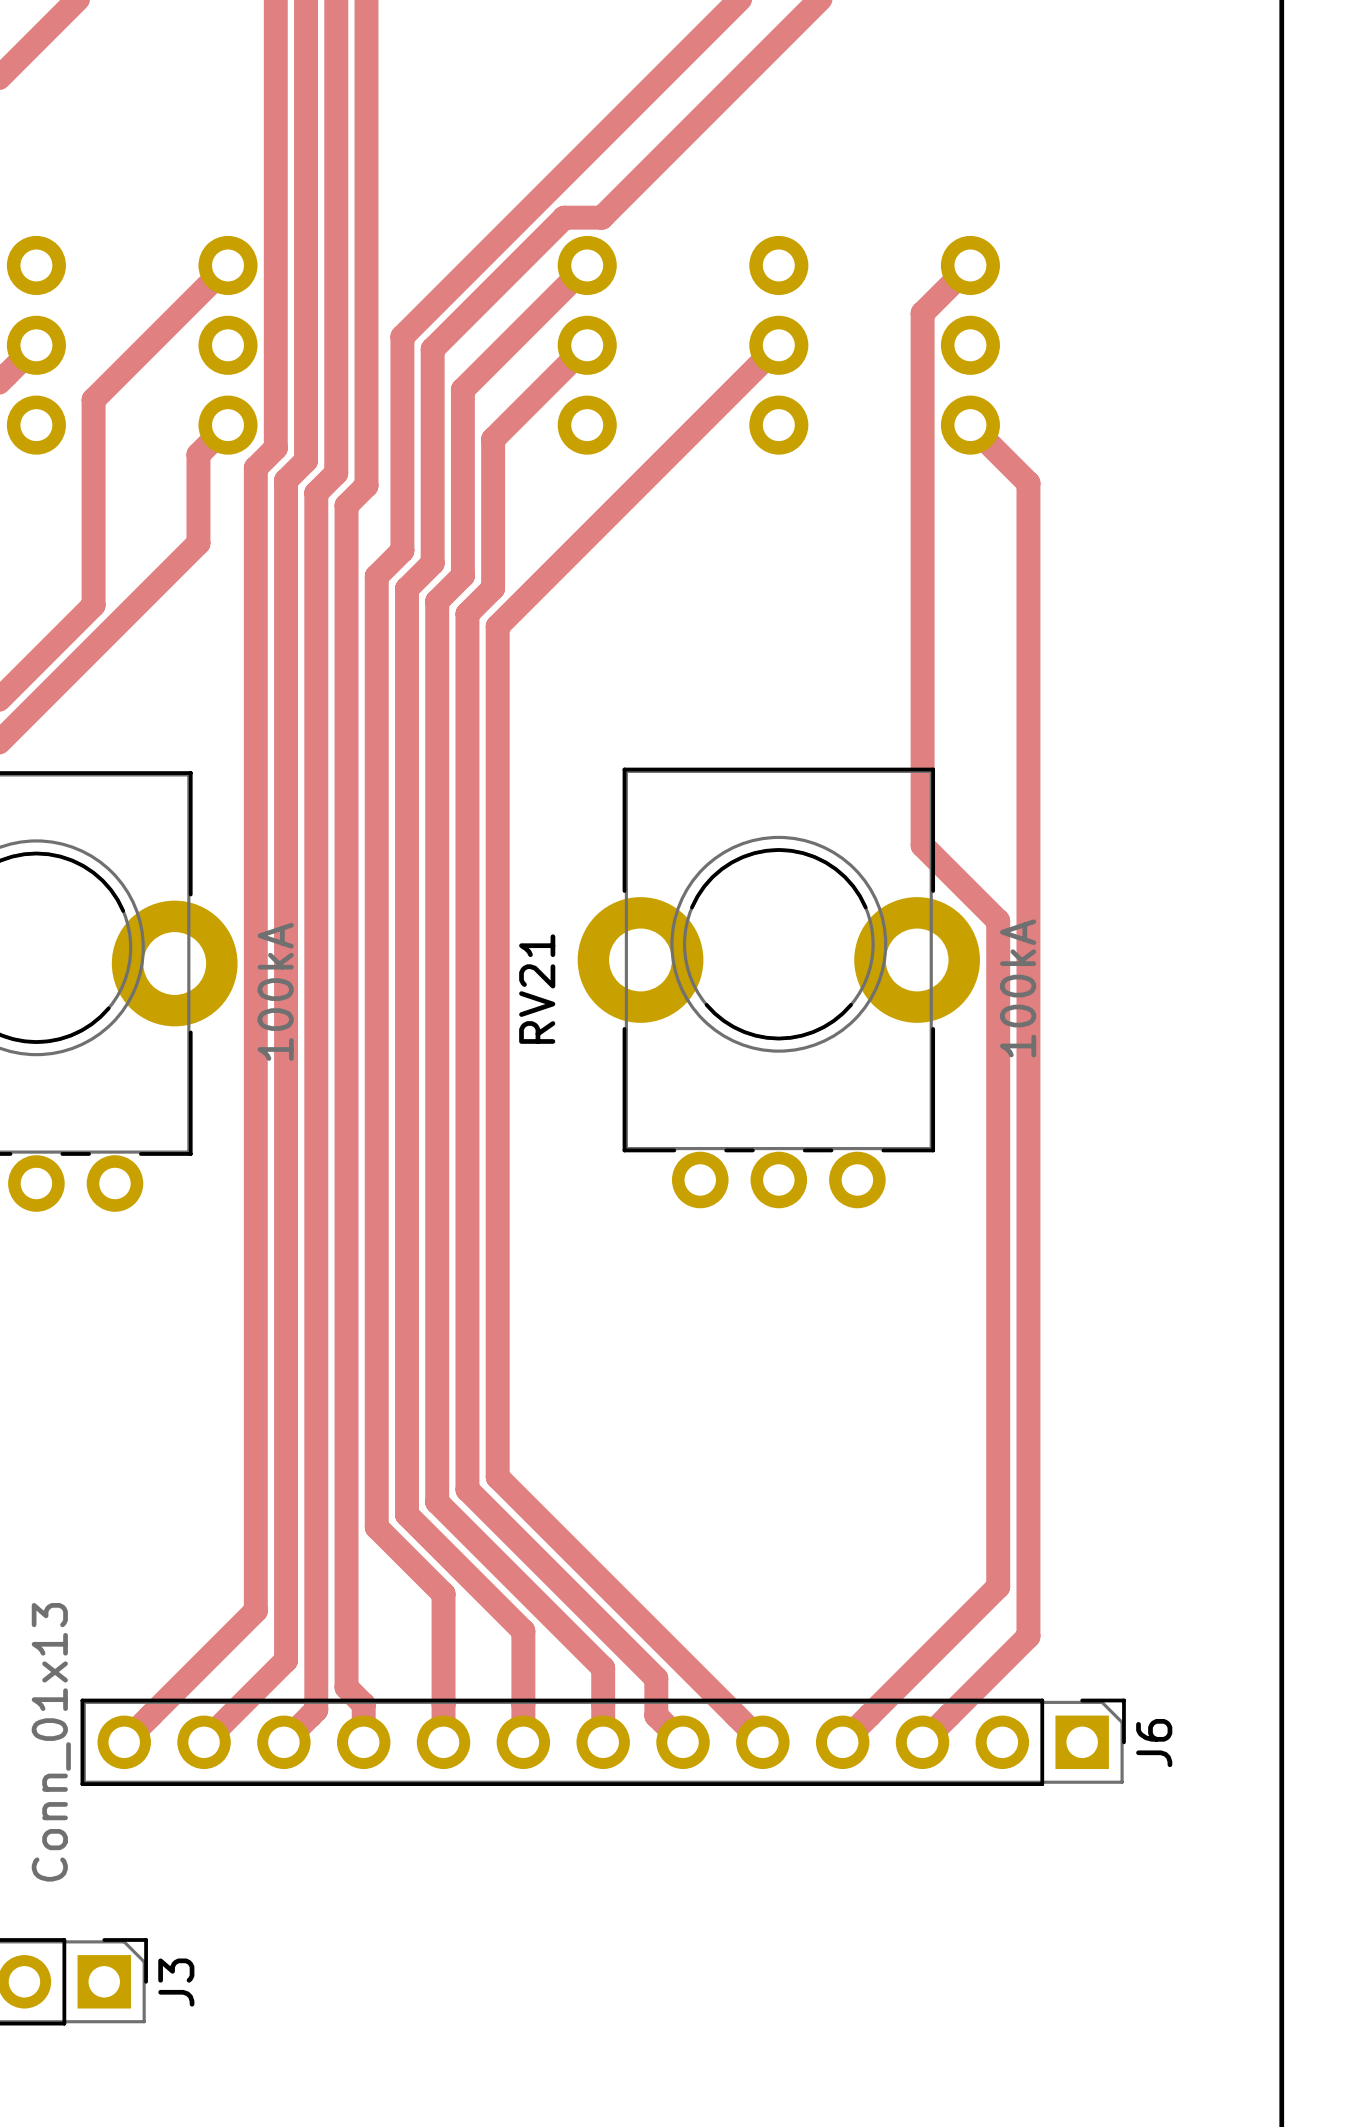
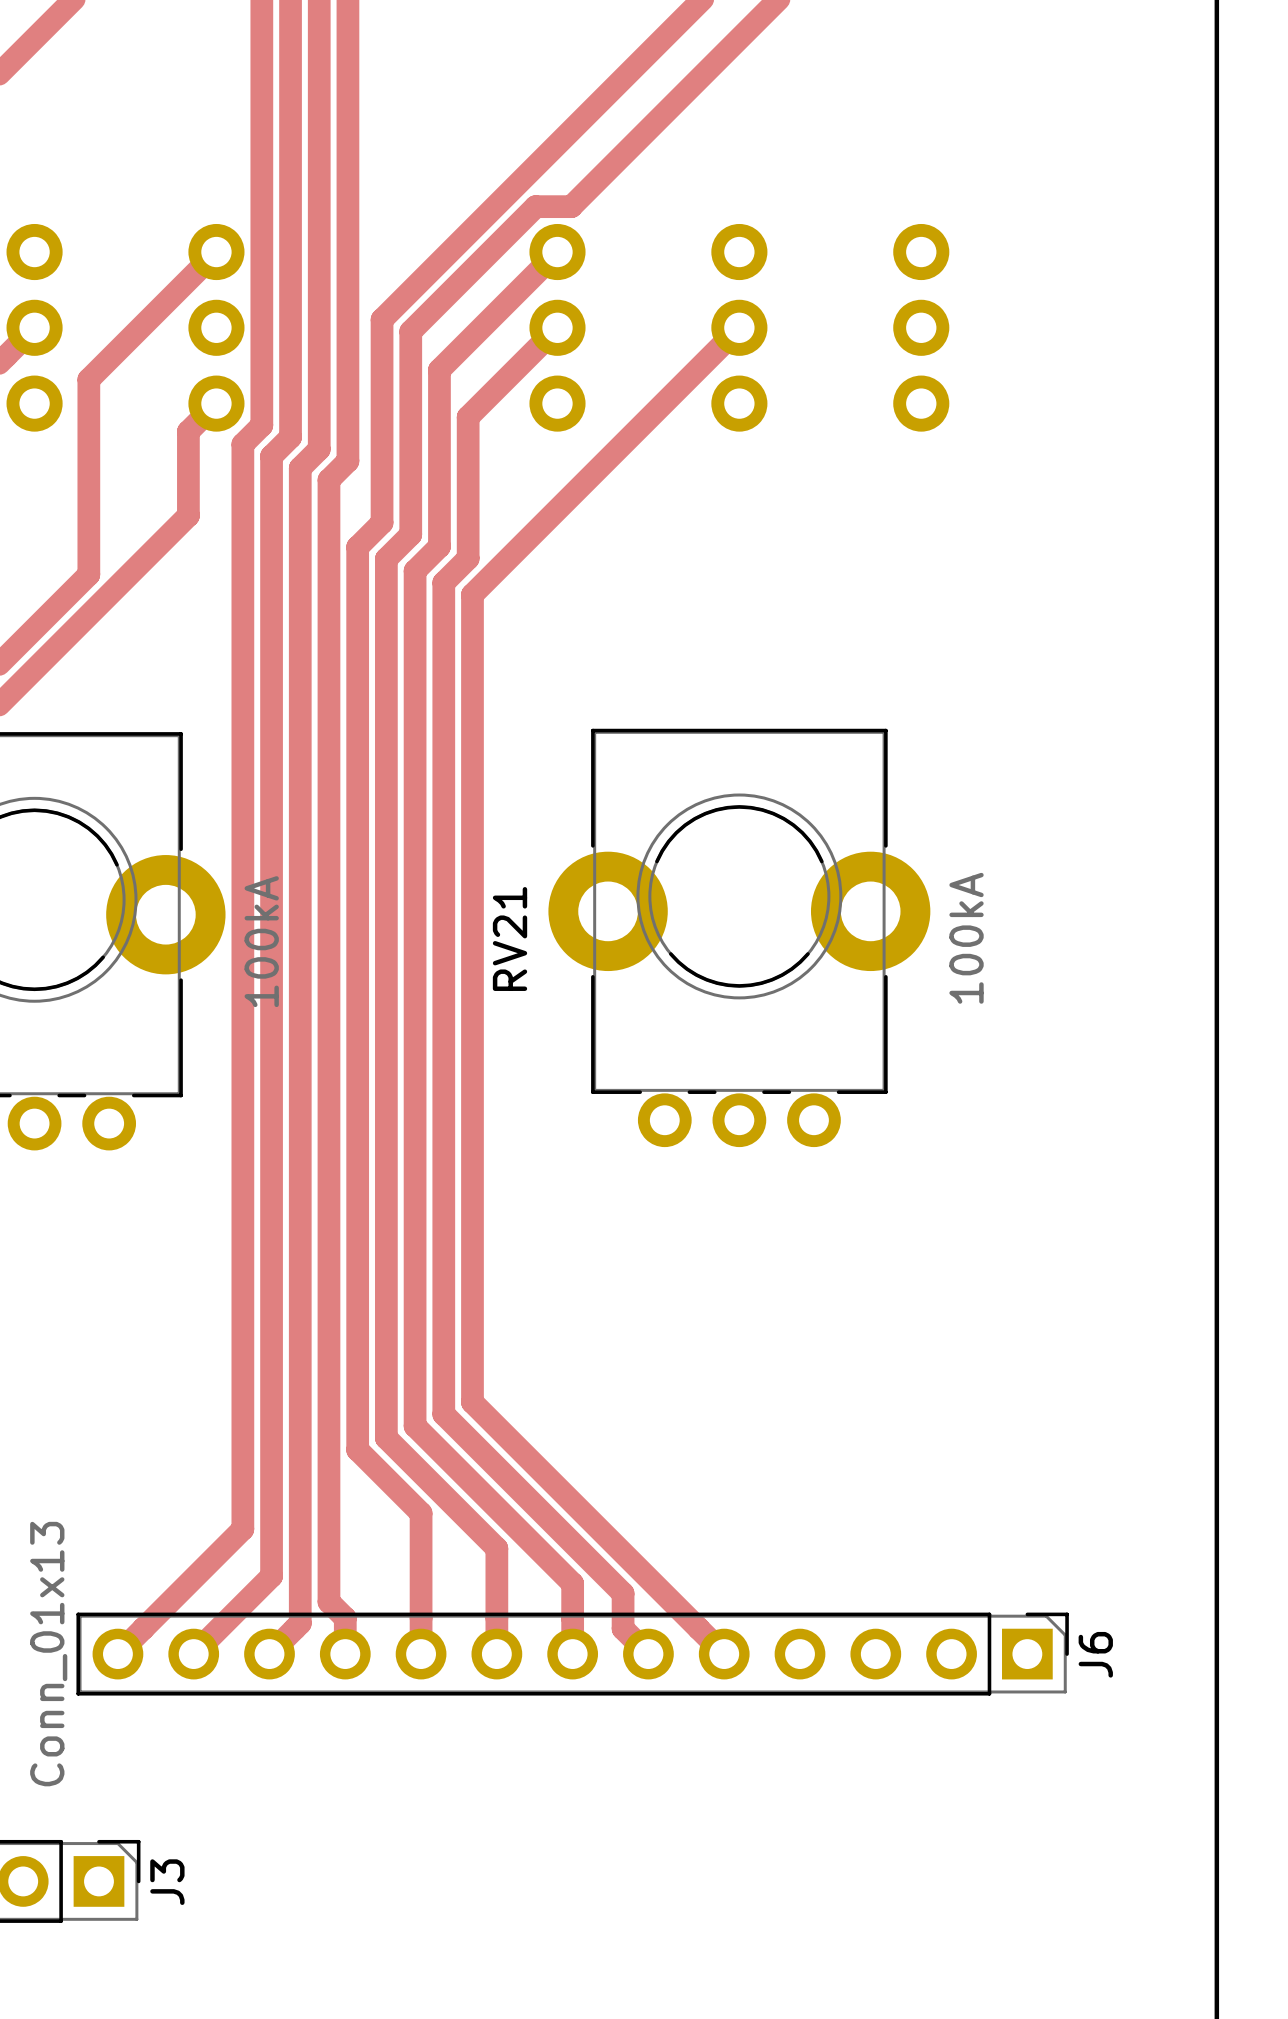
track: (970, 265) (922, 313) (922, 845) (998, 921) (998, 1586) (842, 1742) -> none
track: (970, 425) (1028, 483) (1028, 1636) (922, 1742) -> none

